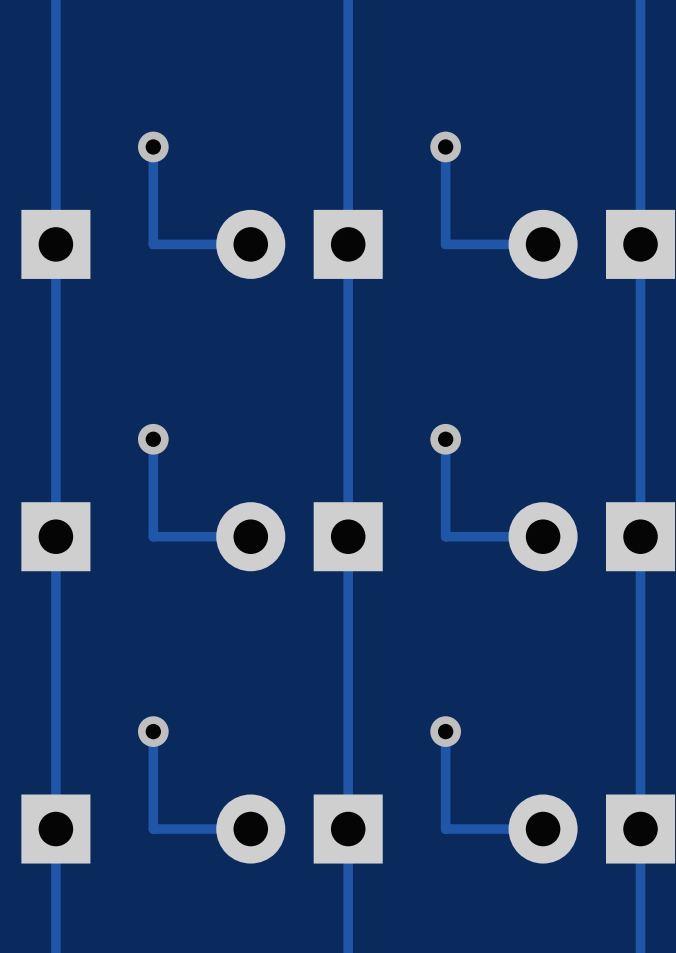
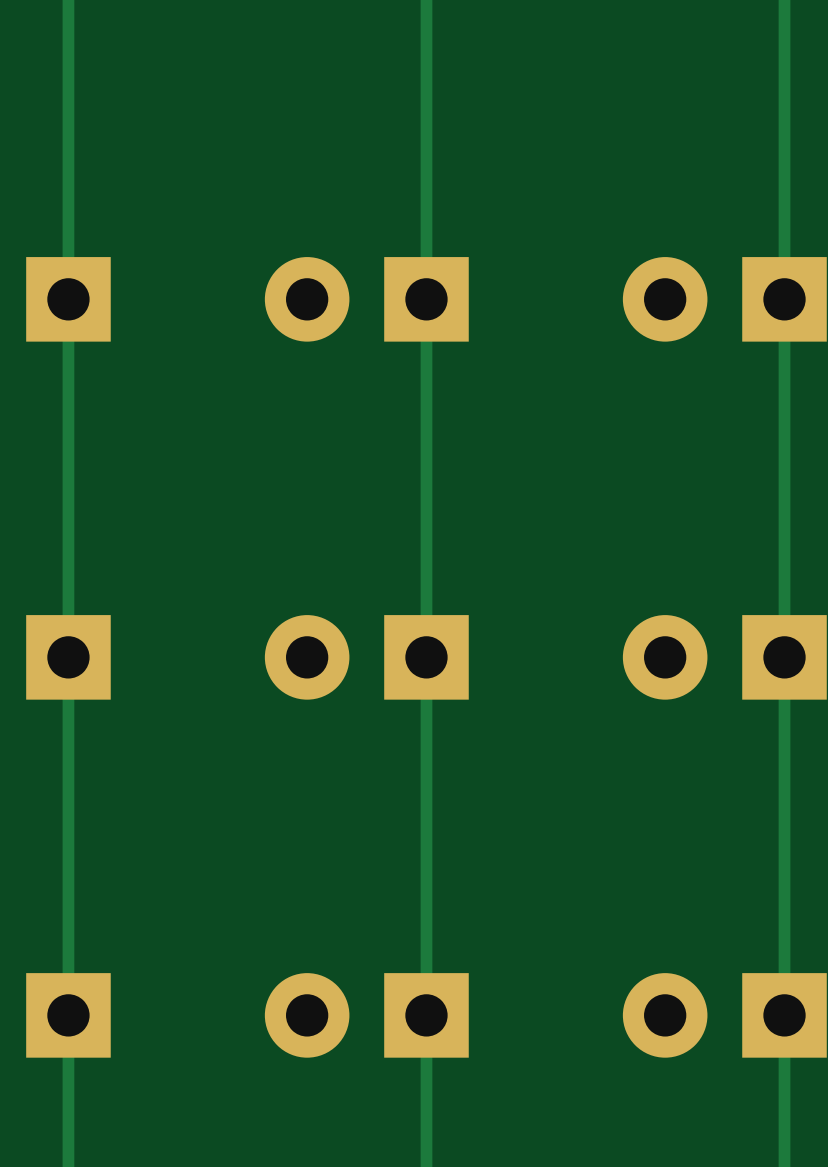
track: (153, 146) (153, 244) (250, 244) -> none
via: (153, 146) -> none
track: (445, 146) (445, 244) (543, 244) -> none
via: (445, 146) -> none
track: (153, 439) (153, 536) (250, 536) -> none
via: (153, 439) -> none
track: (445, 439) (445, 536) (543, 536) -> none
via: (445, 439) -> none
track: (153, 731) (153, 829) (250, 829) -> none
via: (153, 731) -> none
track: (445, 731) (445, 829) (543, 829) -> none
via: (445, 731) -> none

